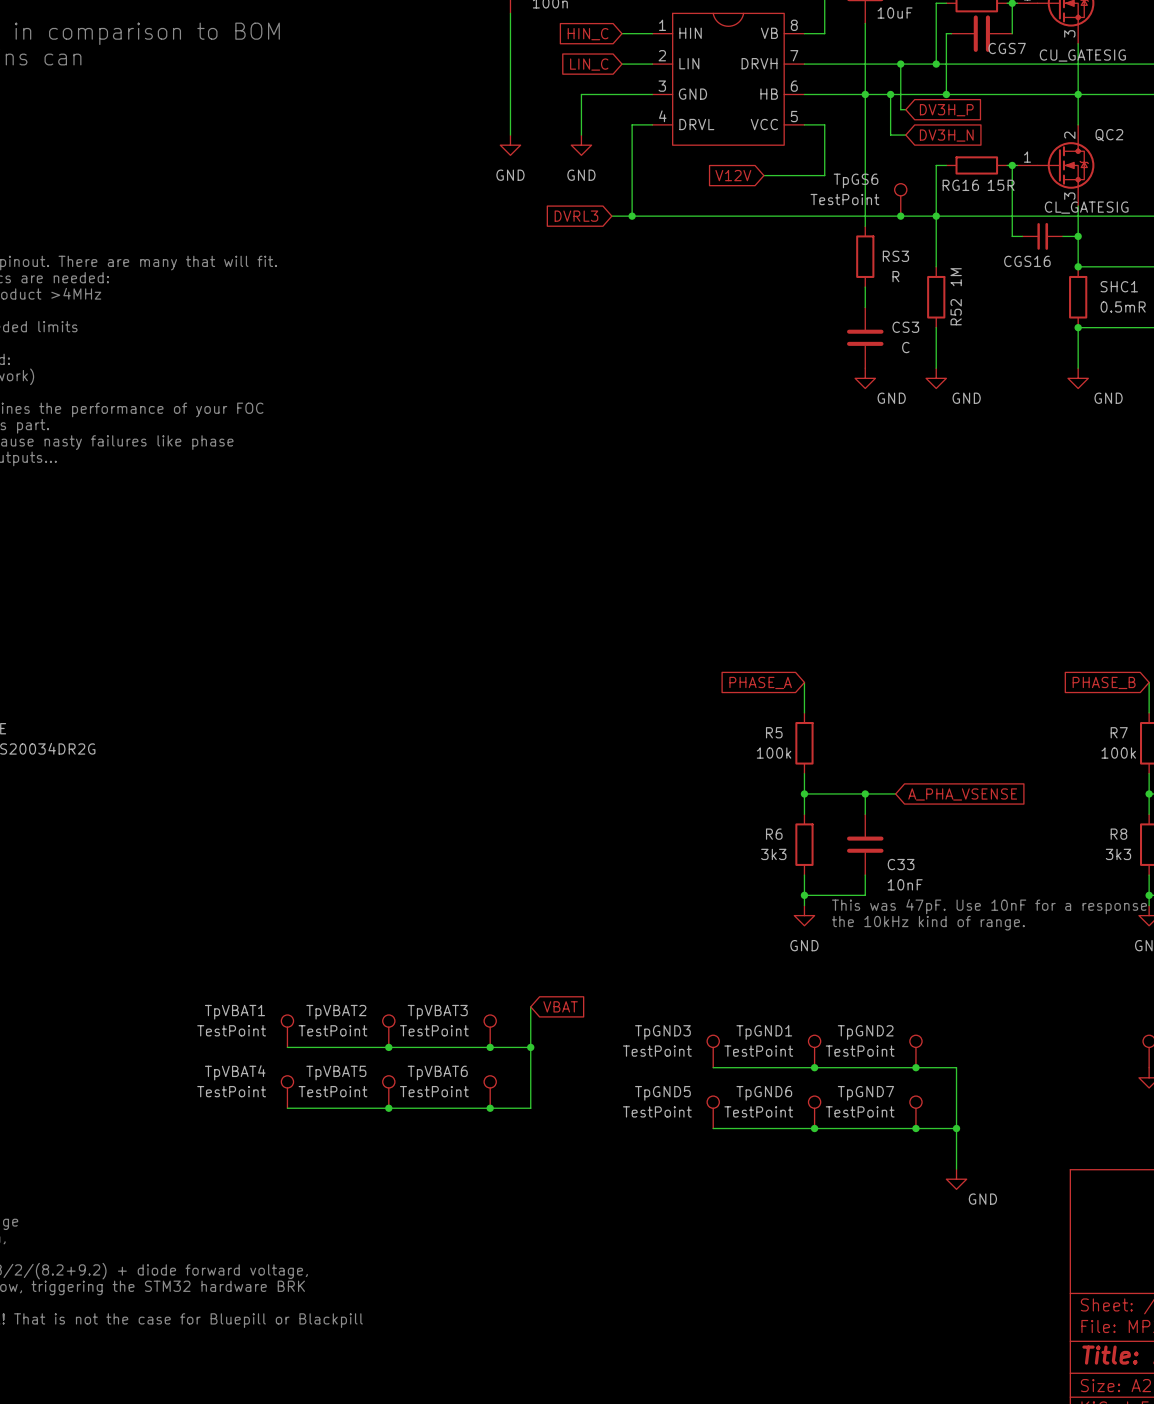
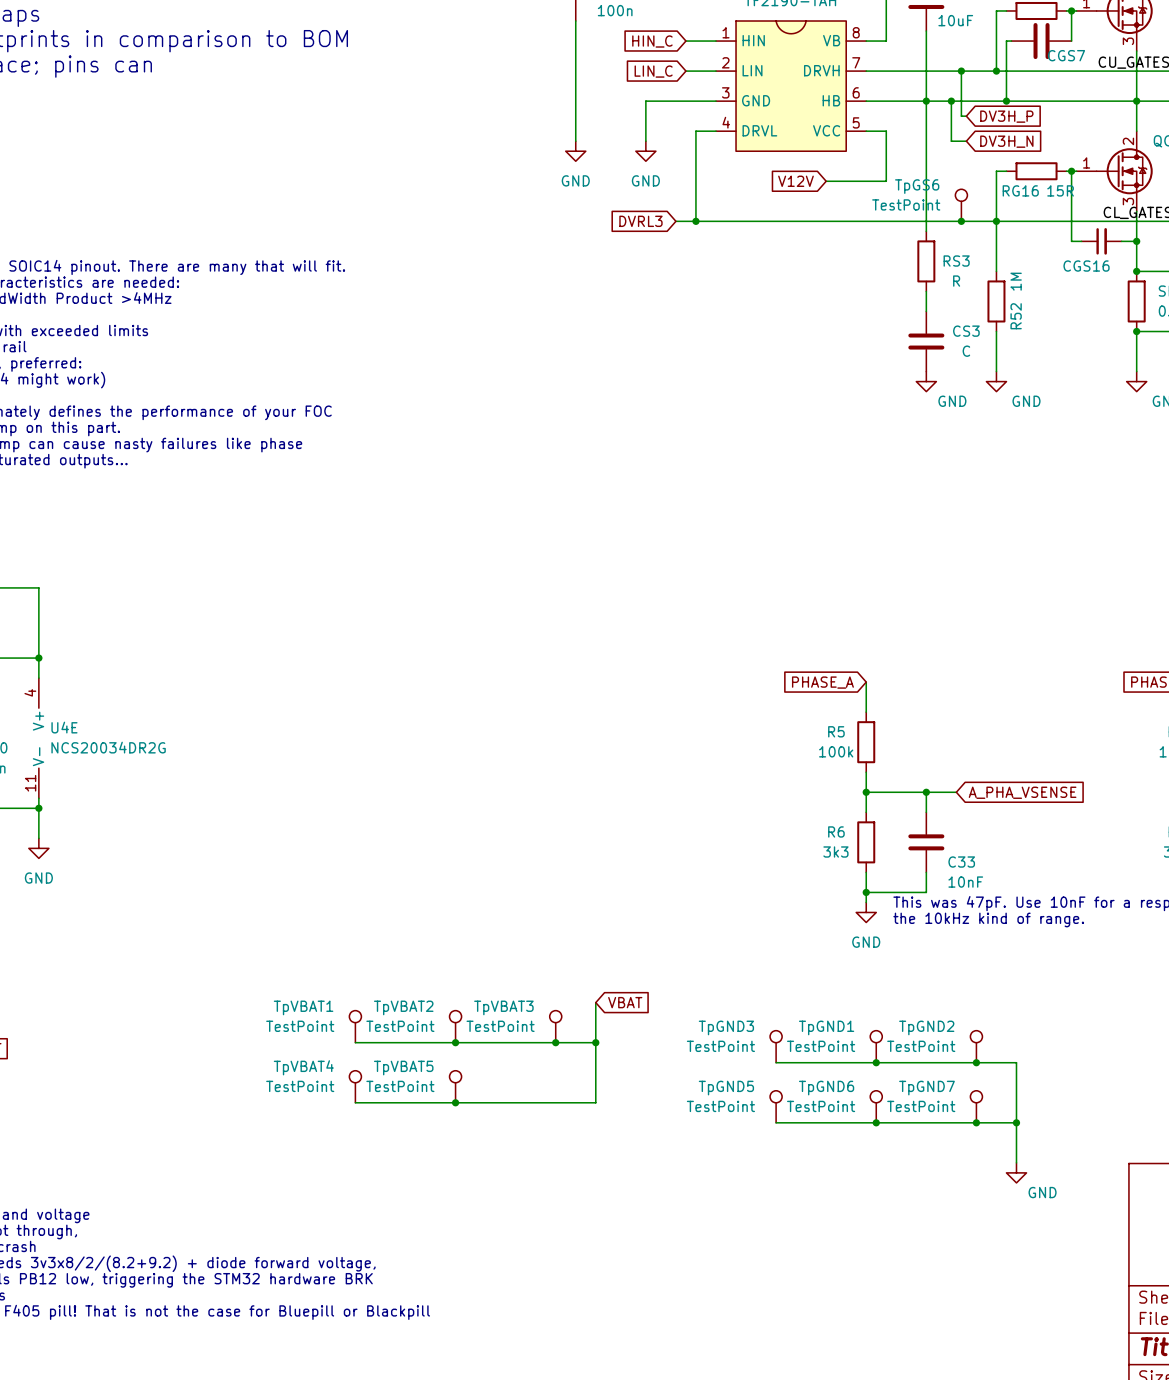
TpVBAT6: TestPoint (490, 1092) -> none
junction: (490, 1108) -> none

